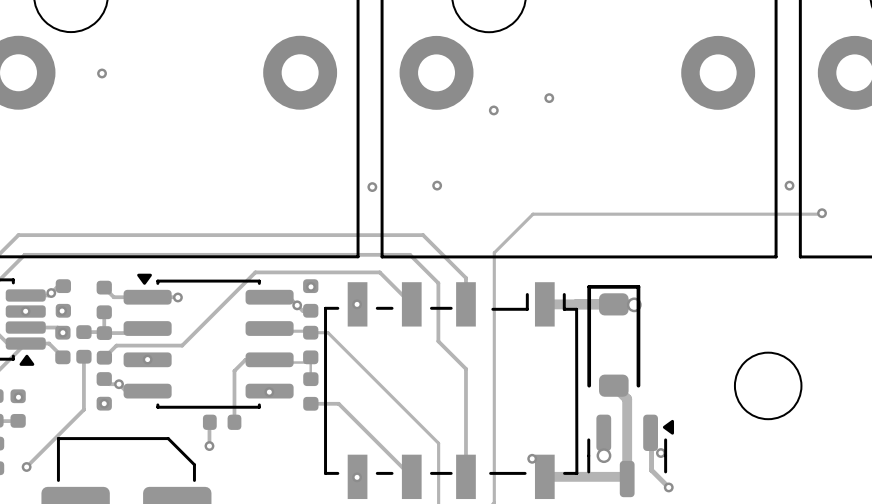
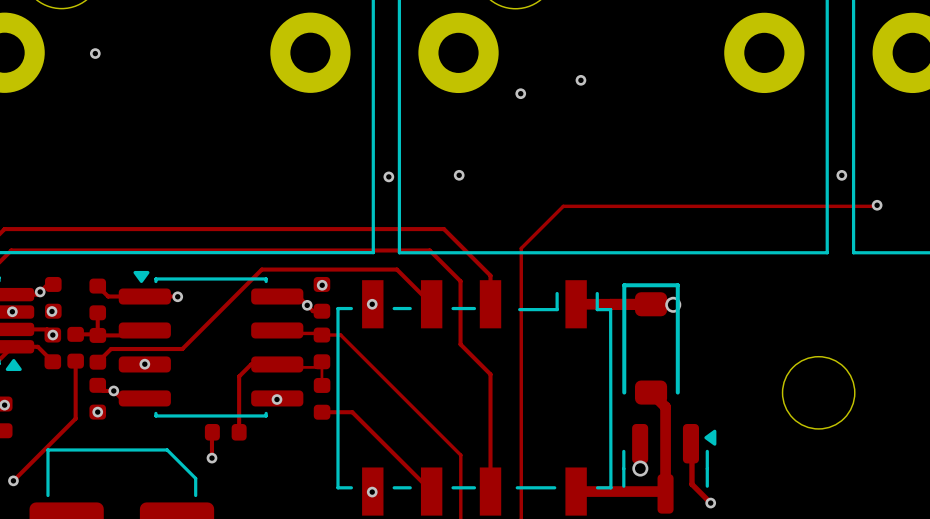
via: (660, 453) -> none
via: (532, 458) -> none

